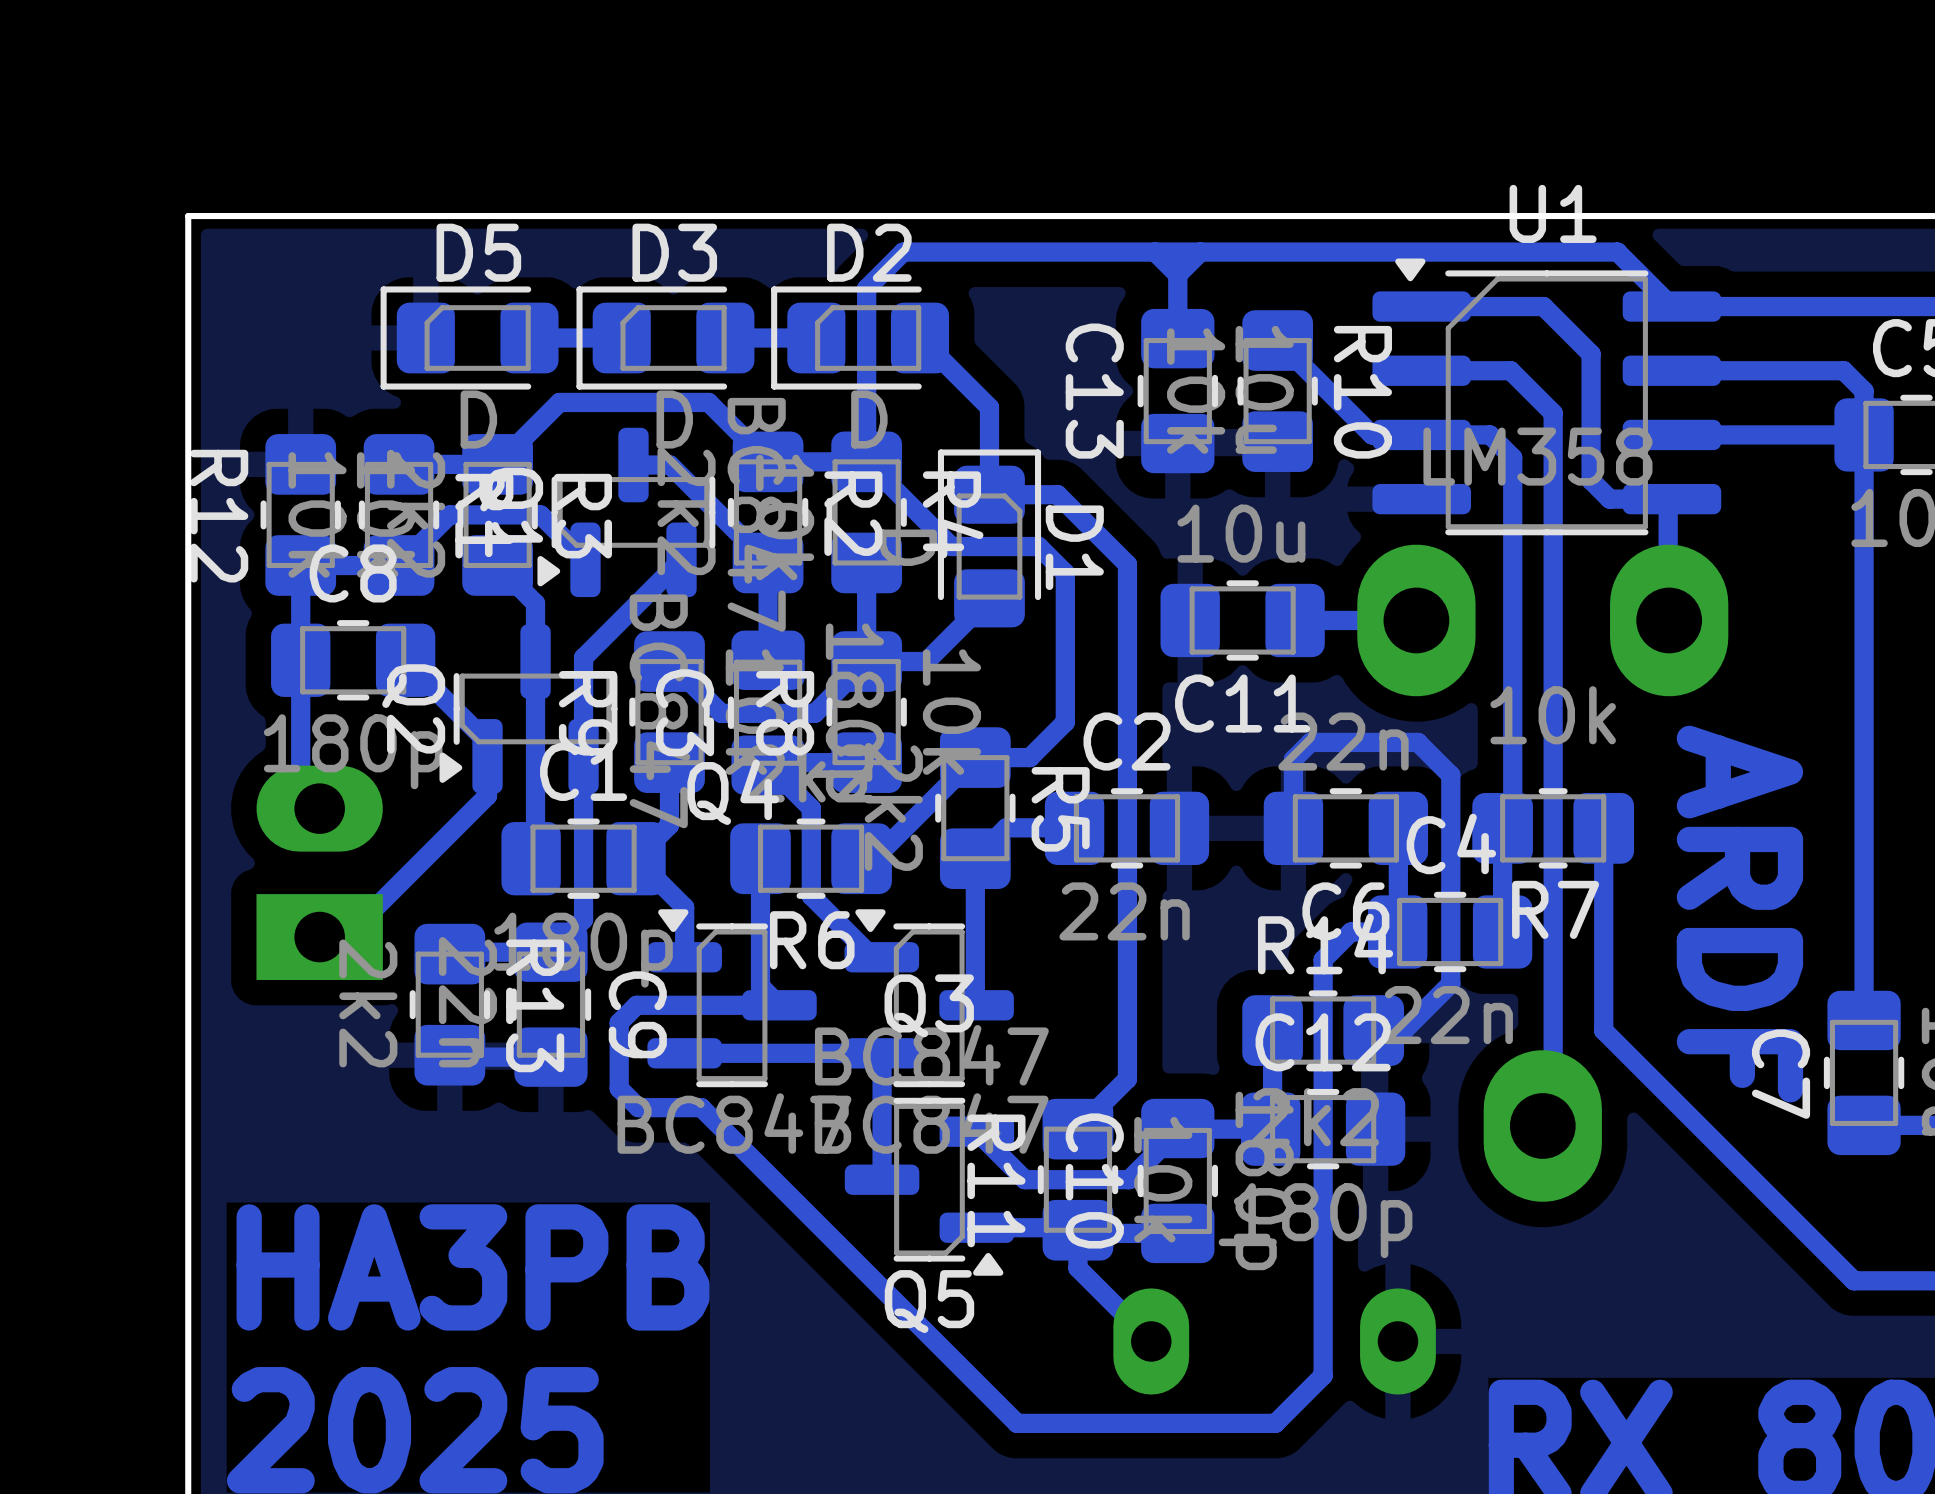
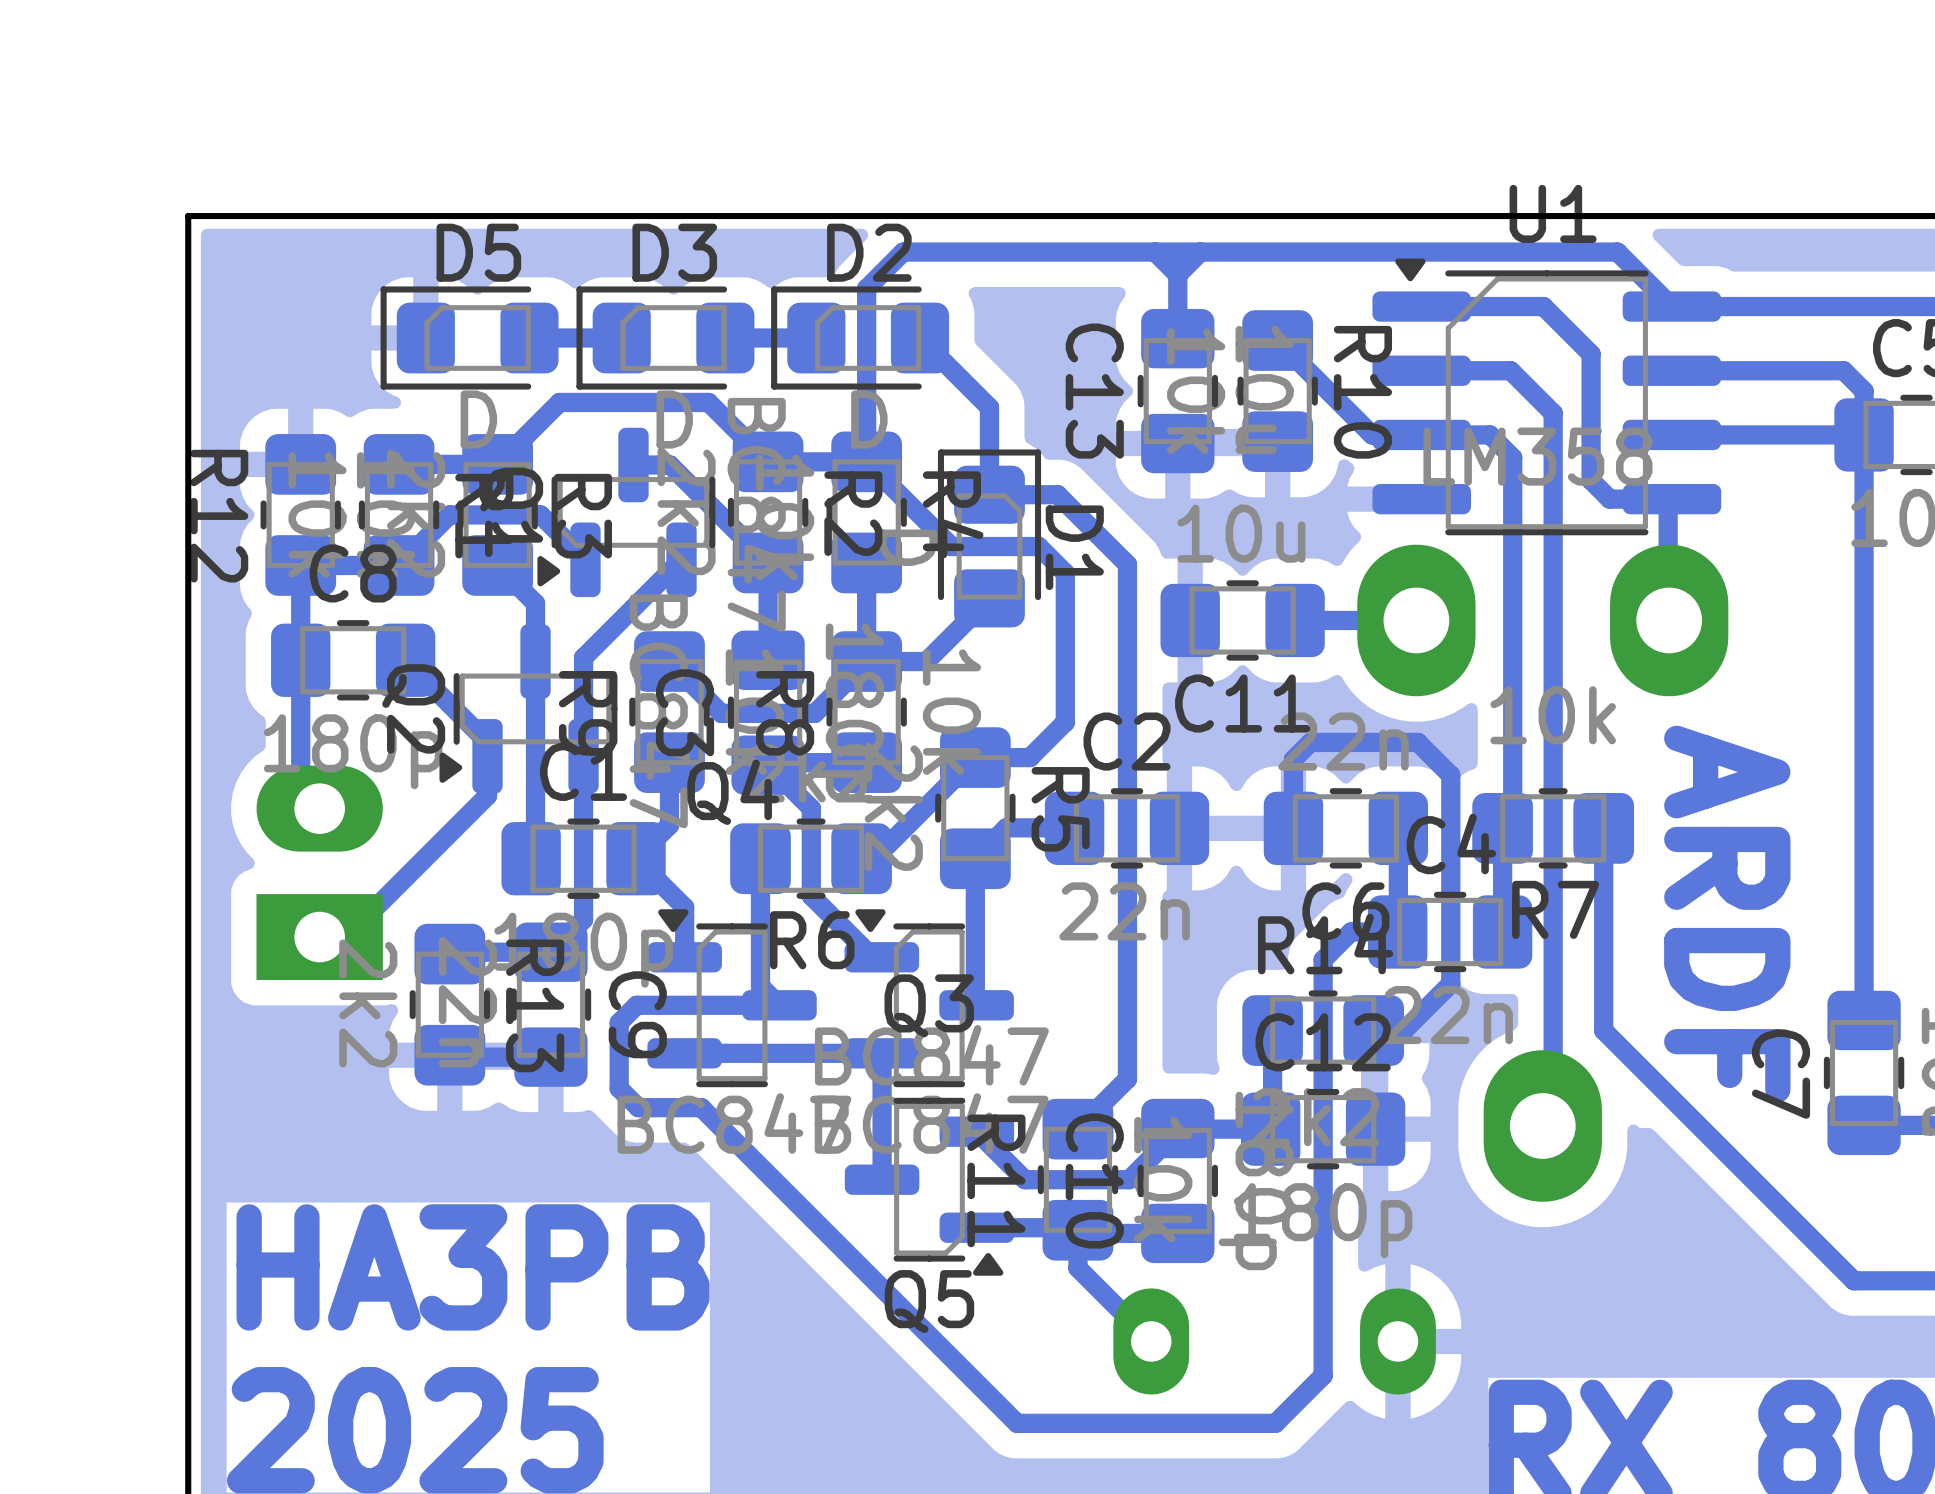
text position: ARDF (1739, 914) -> ARDF (1727, 914)

